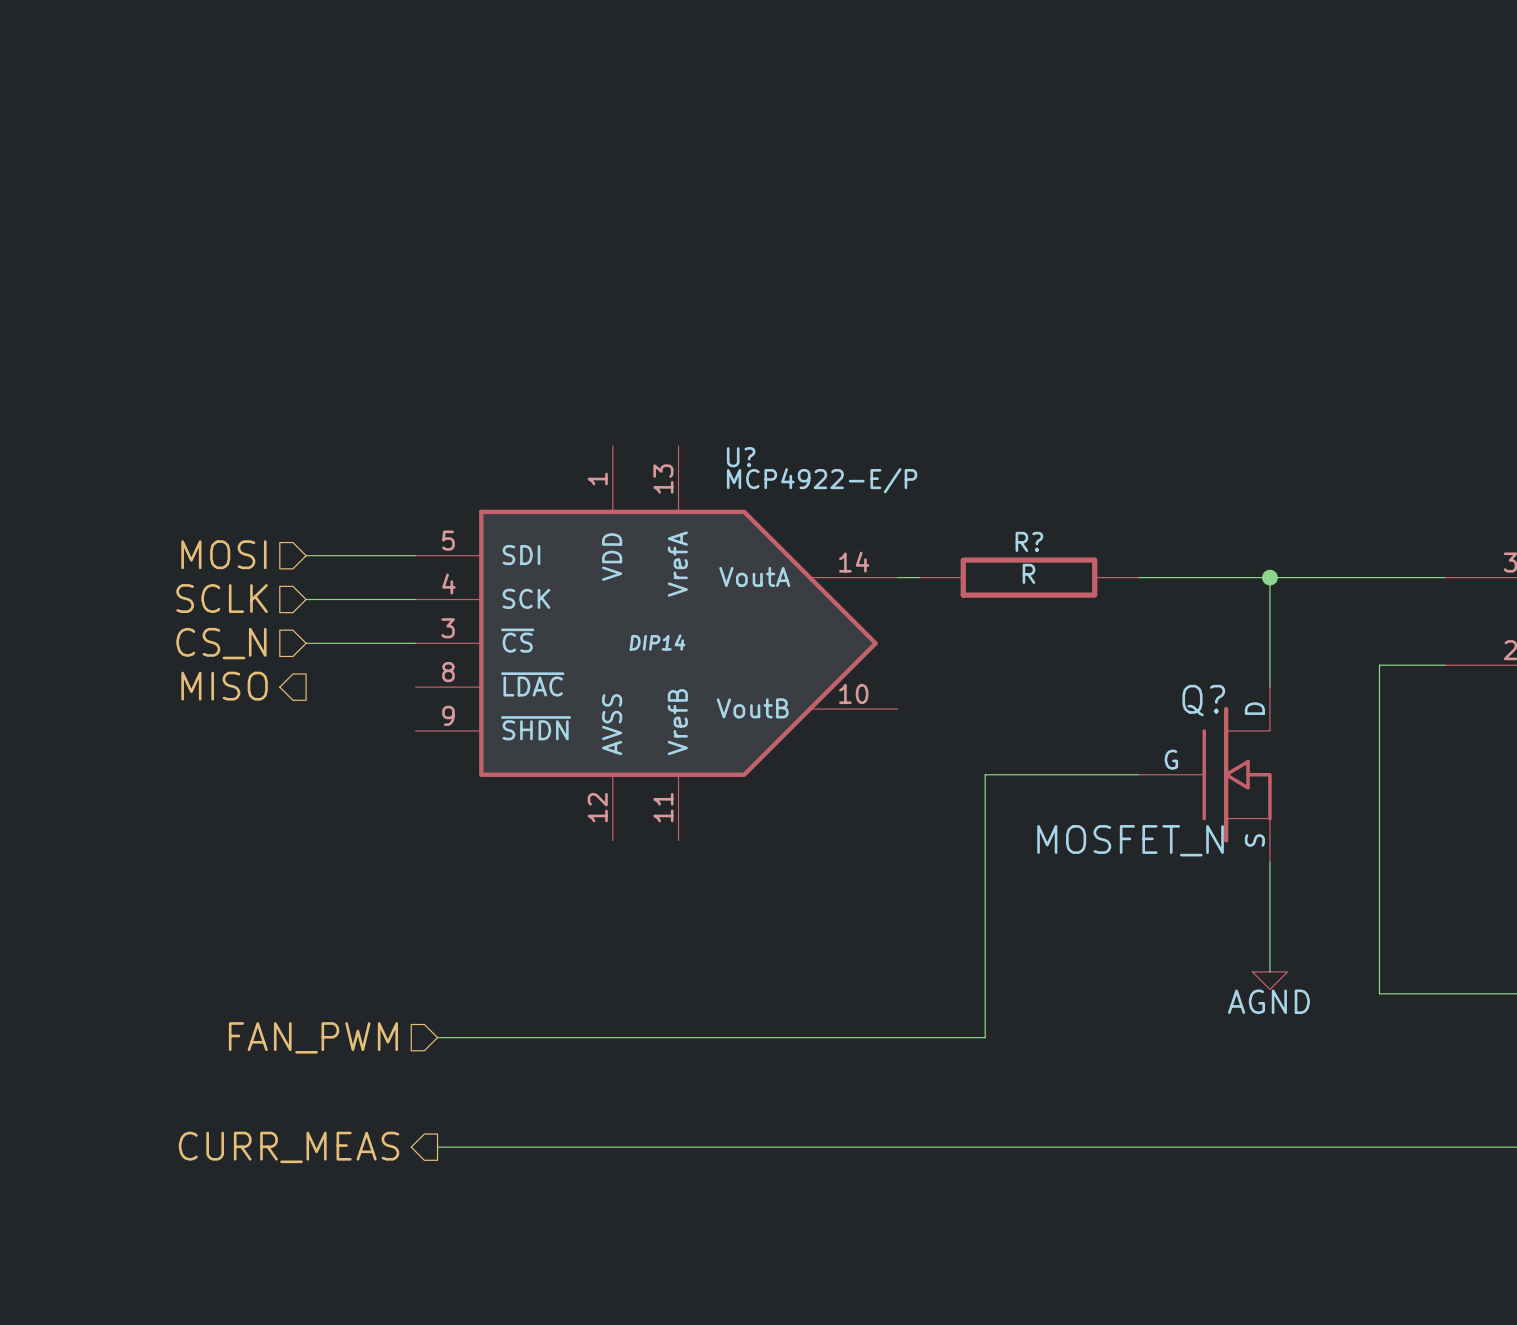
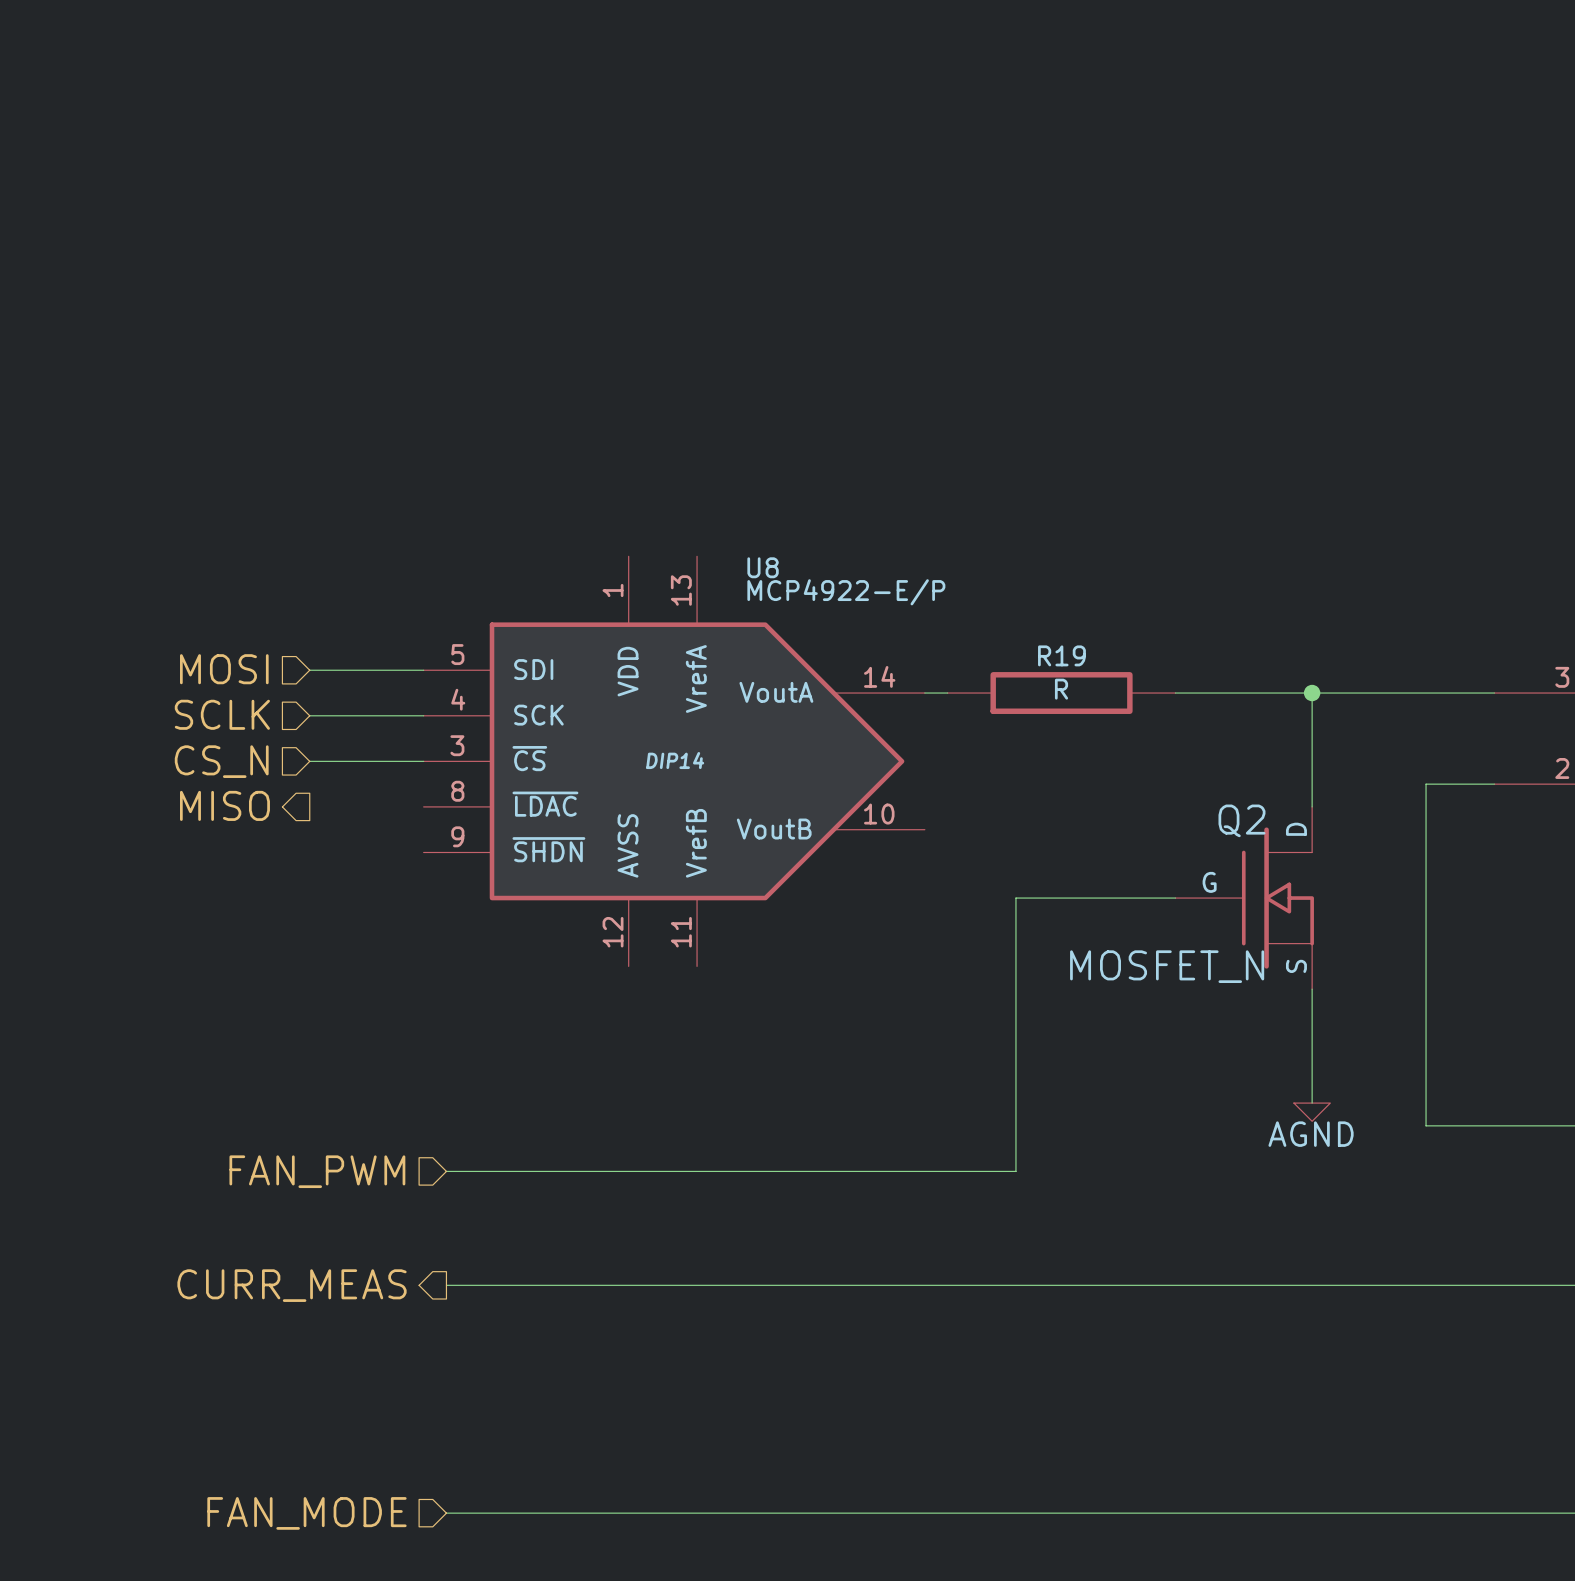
U? name: U? (741, 457) -> U8 (763, 567)
R? name: R? (1029, 541) -> R19 (1061, 655)
Q? name: Q? (1203, 700) -> Q2 (1241, 820)

